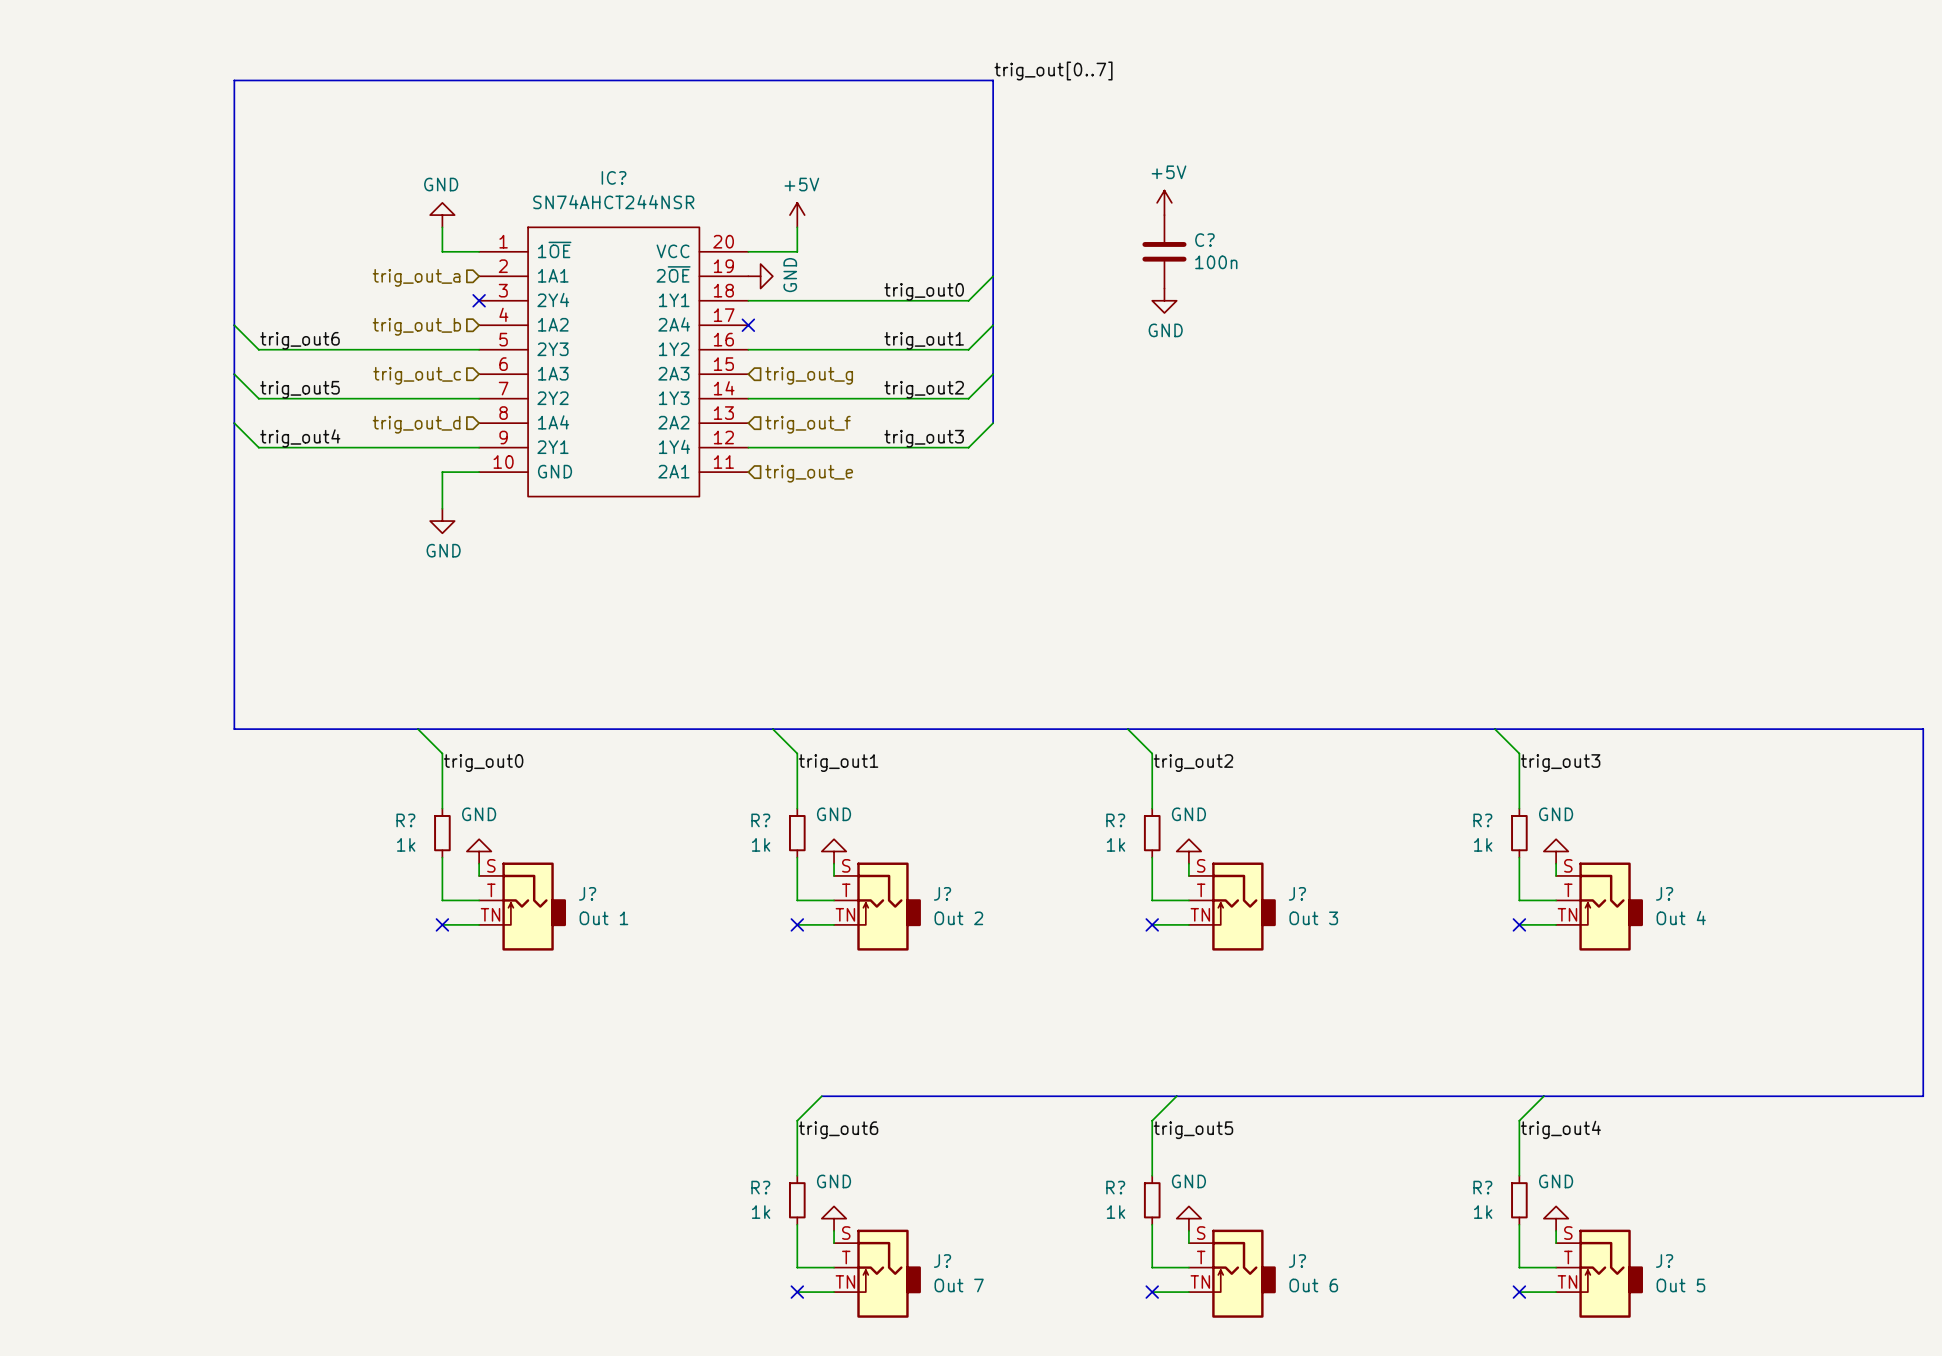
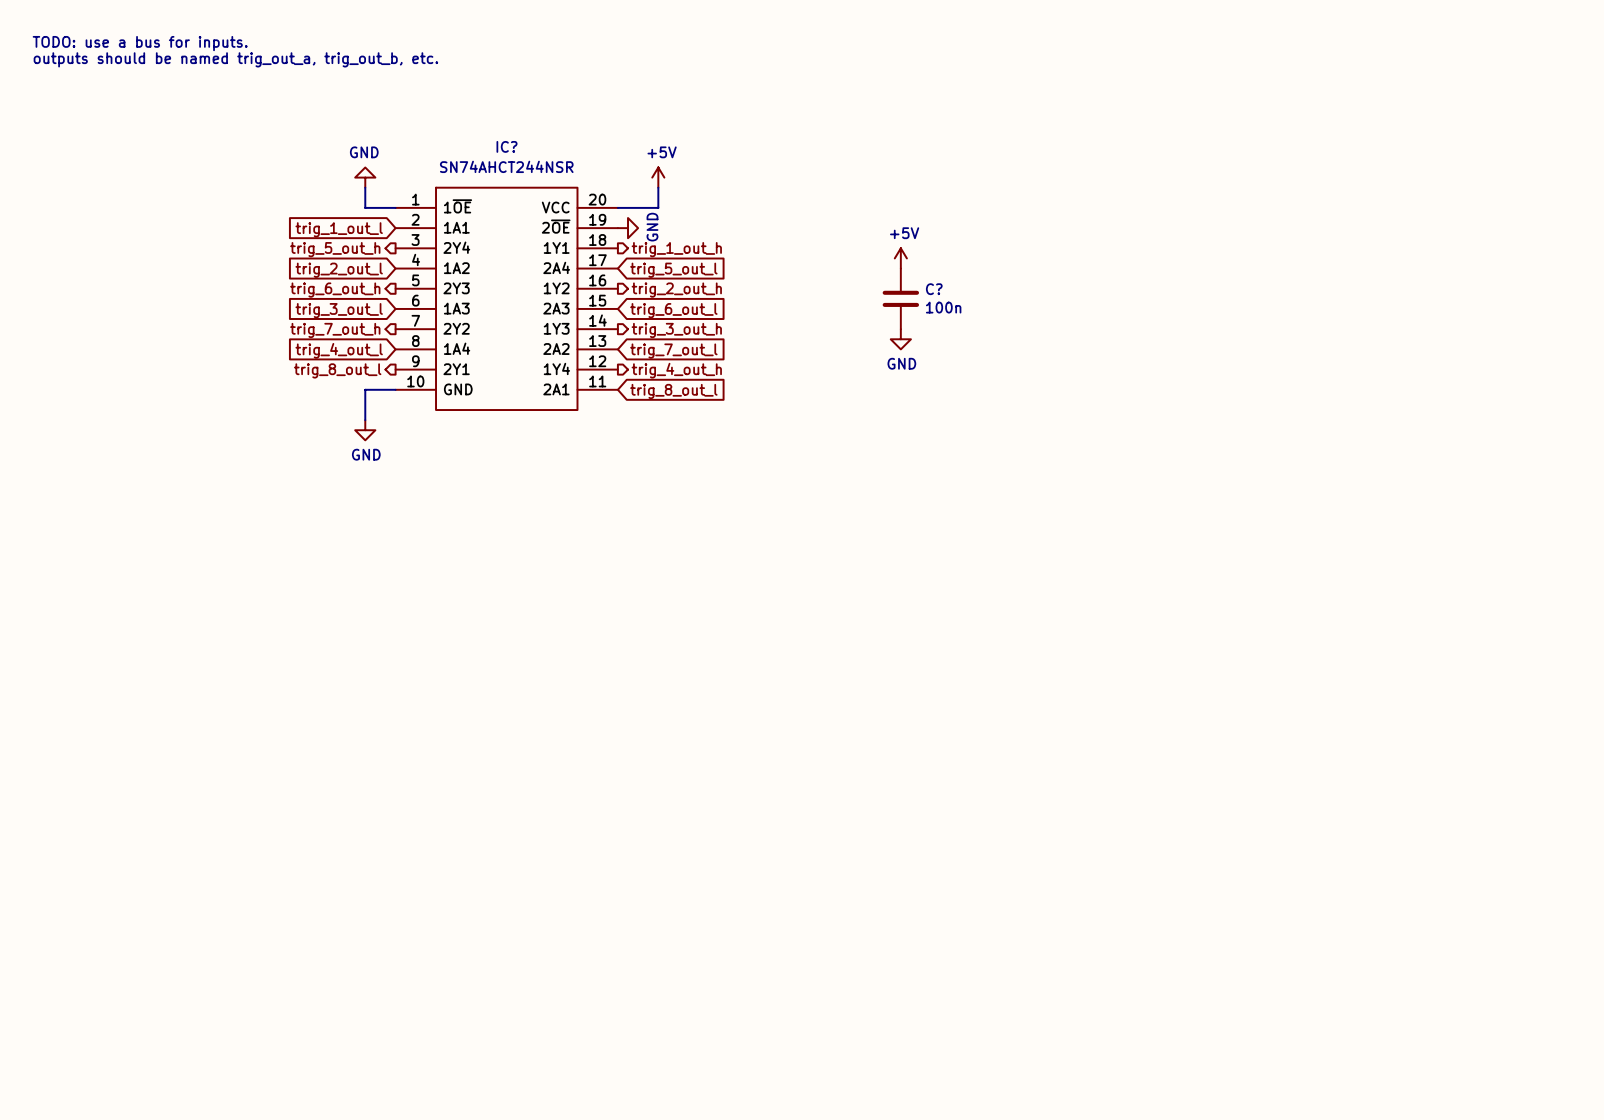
text: none -> TODO: use a bus for inputs. (140, 43)
label: trig_out[0..7] (1053, 71) -> none
text: none -> outputs should be named trig_out_a, trig_out_b, etc. (235, 59)
power symbol position: +5V (1164, 202) -> +5V (900, 258)
C? position: (1164, 251) -> (900, 298)
wire: (993, 276) (968, 300) (748, 300) -> none
hierarchical label: trig_out_a (416, 277) -> none
global label: none -> trig_1_out_l (339, 229)
label: trig_out0 (924, 291) -> none
no-connect mark: (479, 300) -> none
power symbol position: GND (1164, 300) -> GND (900, 339)
hierarchical label: none -> trig_5_out_h (335, 249)
hierarchical label: none -> trig_1_out_h (676, 249)
wire: (234, 325) (258, 349) (479, 349) -> none
no-connect mark: (748, 325) -> none
wire: (993, 325) (968, 349) (748, 349) -> none
hierarchical label: trig_out_b (416, 326) -> none
global label: none -> trig_2_out_l (339, 270)
global label: none -> trig_5_out_l (673, 270)
label: trig_out6 (300, 340) -> none
label: trig_out1 (924, 340) -> none
hierarchical label: none -> trig_6_out_h (335, 290)
hierarchical label: none -> trig_2_out_h (676, 290)
wire: (234, 374) (258, 398) (479, 398) -> none
wire: (993, 374) (968, 398) (748, 398) -> none
hierarchical label: trig_out_c (417, 375) -> none
hierarchical label: trig_out_g (809, 375) -> none
global label: none -> trig_3_out_l (339, 310)
global label: none -> trig_6_out_l (673, 310)
label: trig_out5 (300, 389) -> none
label: trig_out2 (924, 389) -> none
hierarchical label: none -> trig_7_out_h (335, 330)
hierarchical label: none -> trig_3_out_h (676, 330)
wire: (234, 423) (258, 447) (479, 447) -> none
wire: (993, 423) (968, 447) (748, 447) -> none
bus: (993, 423) (993, 80) (234, 80) (234, 729) (1923, 729) (1923, 1096) (821, 1096) -> none
global label: none -> trig_4_out_l (339, 350)
hierarchical label: trig_out_d (416, 424) -> none
hierarchical label: trig_out_f (807, 424) -> none
global label: none -> trig_7_out_l (673, 351)
label: trig_out4 (300, 438) -> none
label: trig_out3 (924, 438) -> none
hierarchical label: none -> trig_4_out_h (676, 370)
hierarchical label: none -> trig_8_out_l (337, 370)
hierarchical label: trig_out_e (809, 473) -> none
global label: none -> trig_8_out_l (673, 391)
wire: (417, 729) (442, 753) (442, 808) -> none
wire: (772, 729) (797, 753) (797, 808) -> none
wire: (1127, 729) (1152, 753) (1152, 808) -> none
wire: (1494, 729) (1519, 753) (1519, 808) -> none
label: trig_out0 (483, 763) -> none
label: trig_out1 (838, 763) -> none
label: trig_out2 (1193, 763) -> none
label: trig_out3 (1560, 763) -> none
R?: 1k (442, 833) -> none
R?: 1k (797, 833) -> none
R?: 1k (1152, 833) -> none
R?: 1k (1519, 833) -> none
power symbol: GND (479, 851) -> none
power symbol: GND (834, 851) -> none
power symbol: GND (1188, 851) -> none
power symbol: GND (1556, 851) -> none
wire: (442, 857) (442, 900) (479, 900) -> none
wire: (797, 857) (797, 900) (834, 900) -> none
wire: (1152, 857) (1152, 900) (1188, 900) -> none
wire: (1519, 857) (1519, 900) (1556, 900) -> none
wire: (479, 863) (479, 875) -> none
wire: (834, 863) (834, 875) -> none
wire: (1188, 863) (1188, 875) -> none
wire: (1556, 863) (1556, 875) -> none
J?: Out 1 (522, 906) -> none
J?: Out 2 (877, 906) -> none
J?: Out 3 (1232, 906) -> none
J?: Out 4 (1599, 906) -> none
wire: (442, 924) (479, 924) -> none
no-connect mark: (442, 924) -> none
wire: (797, 924) (834, 924) -> none
no-connect mark: (797, 924) -> none
wire: (1152, 924) (1188, 924) -> none
no-connect mark: (1152, 924) -> none
wire: (1519, 924) (1556, 924) -> none
no-connect mark: (1519, 924) -> none
wire: (821, 1096) (797, 1120) (797, 1175) -> none
wire: (1176, 1096) (1152, 1120) (1152, 1175) -> none
wire: (1543, 1096) (1519, 1120) (1519, 1175) -> none
label: trig_out4 (1560, 1129) -> none
label: trig_out6 (838, 1130) -> none
label: trig_out5 (1193, 1130) -> none
R?: 1k (797, 1200) -> none
R?: 1k (1152, 1200) -> none
R?: 1k (1519, 1200) -> none
power symbol: GND (834, 1218) -> none
power symbol: GND (1188, 1218) -> none
power symbol: GND (1556, 1218) -> none
wire: (797, 1224) (797, 1267) (834, 1267) -> none
wire: (1152, 1224) (1152, 1267) (1188, 1267) -> none
wire: (1519, 1224) (1519, 1267) (1556, 1267) -> none
wire: (834, 1230) (834, 1243) -> none
wire: (1188, 1230) (1188, 1243) -> none
wire: (1556, 1230) (1556, 1243) -> none
J?: Out 7 (877, 1273) -> none
J?: Out 6 (1232, 1273) -> none
J?: Out 5 (1599, 1273) -> none
wire: (797, 1292) (834, 1292) -> none
no-connect mark: (797, 1292) -> none
wire: (1152, 1292) (1188, 1292) -> none
no-connect mark: (1152, 1292) -> none
wire: (1519, 1292) (1556, 1292) -> none
no-connect mark: (1519, 1292) -> none

